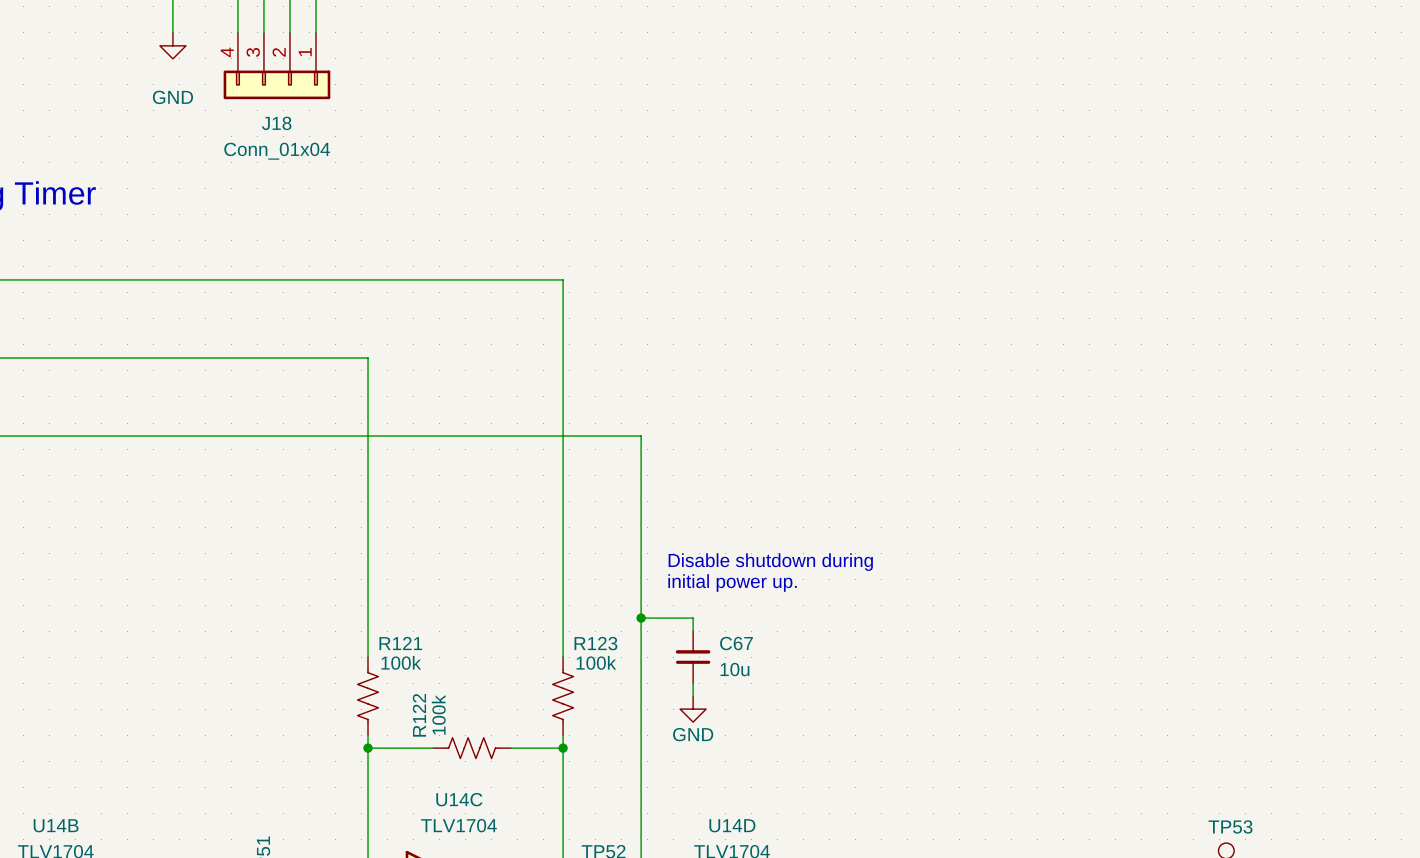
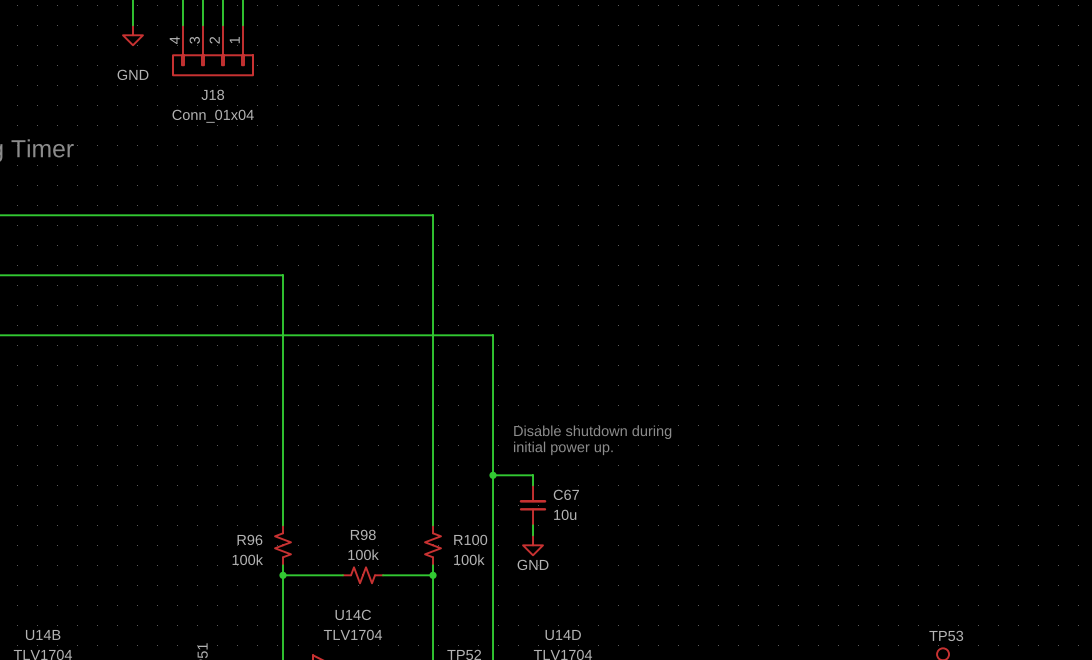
R121: 100k (368, 696) -> none
R123: 100k (563, 696) -> none
R96: none -> 100k (282, 545)
R100: none -> 100k (433, 545)
R122: 100k (472, 748) -> none
R98: none -> 100k (363, 575)

